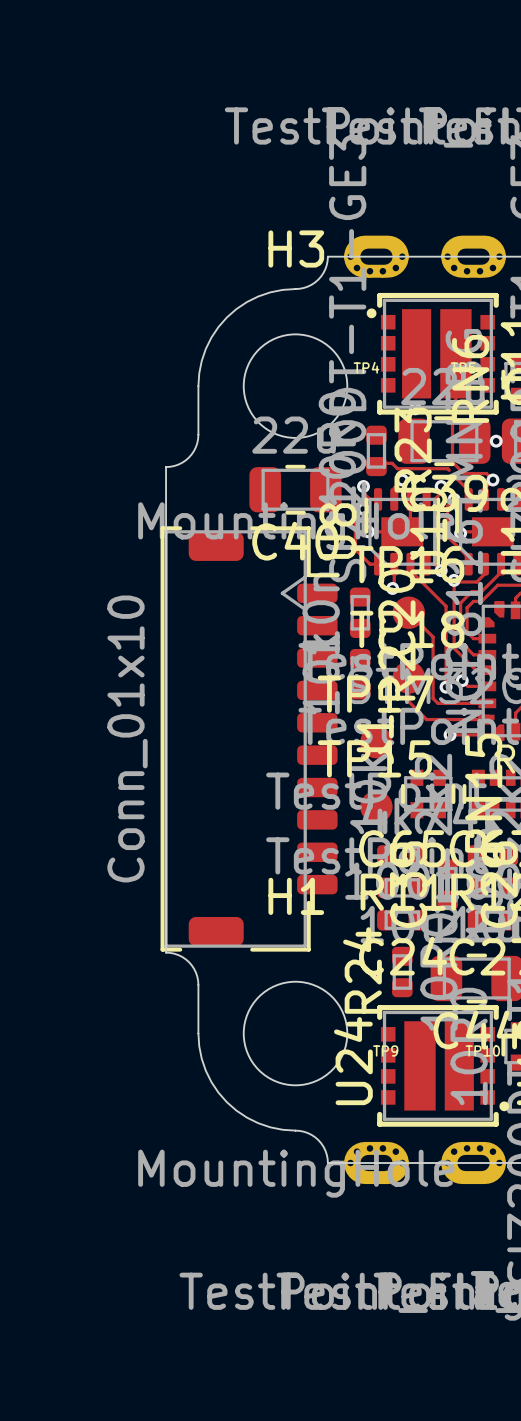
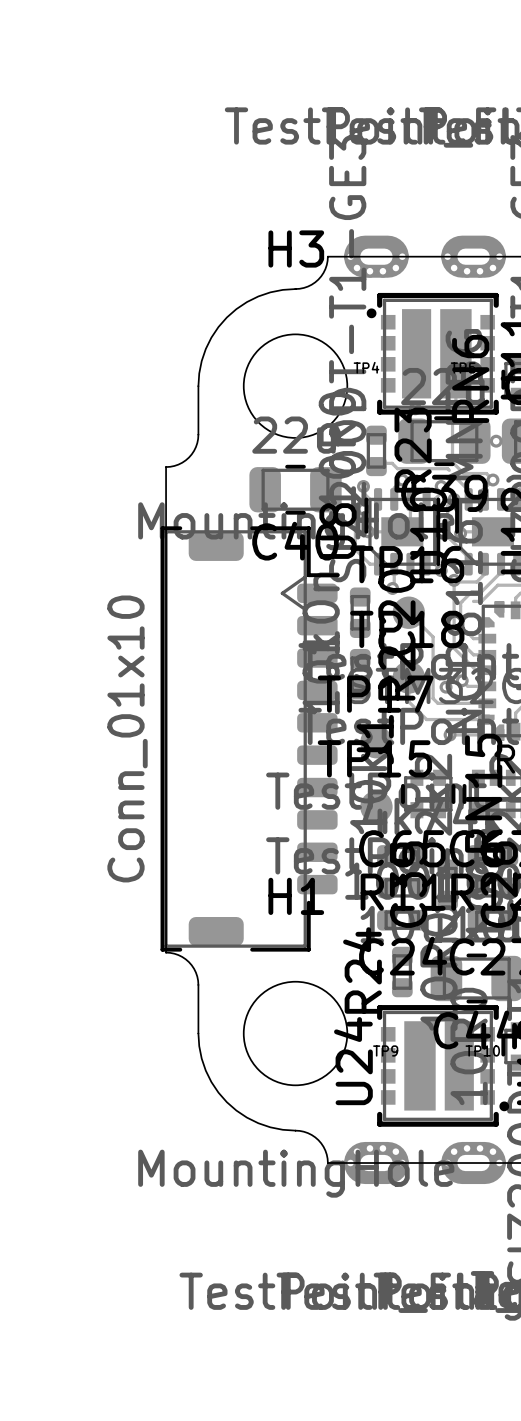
track: (410, 564) (410, 570) (446, 606) (446, 687) -> none
track: (473, 601) (467, 607) (467, 632) -> none

